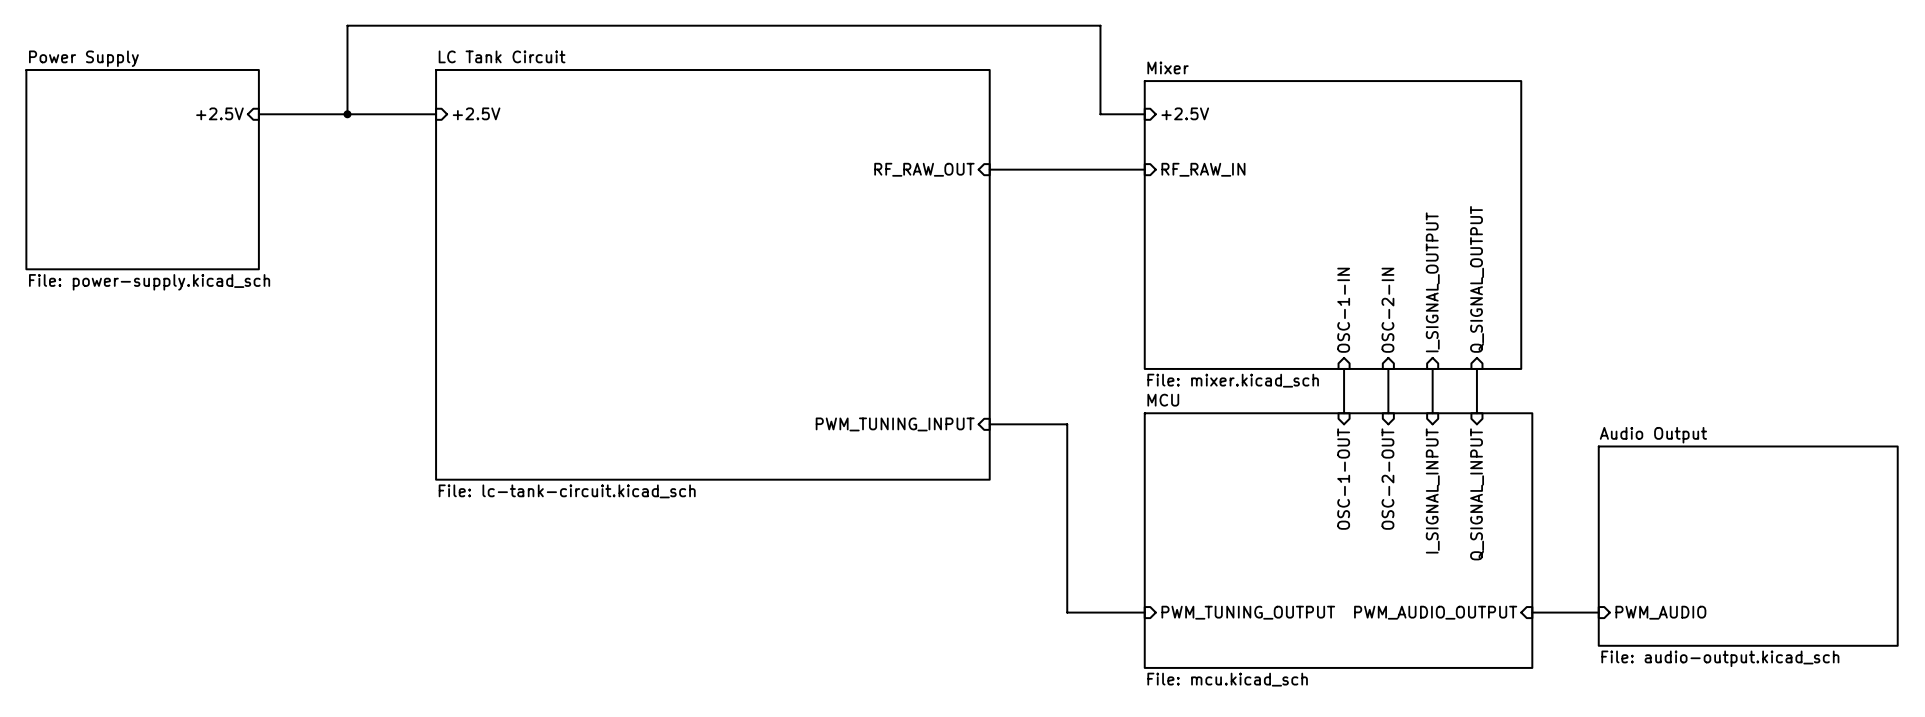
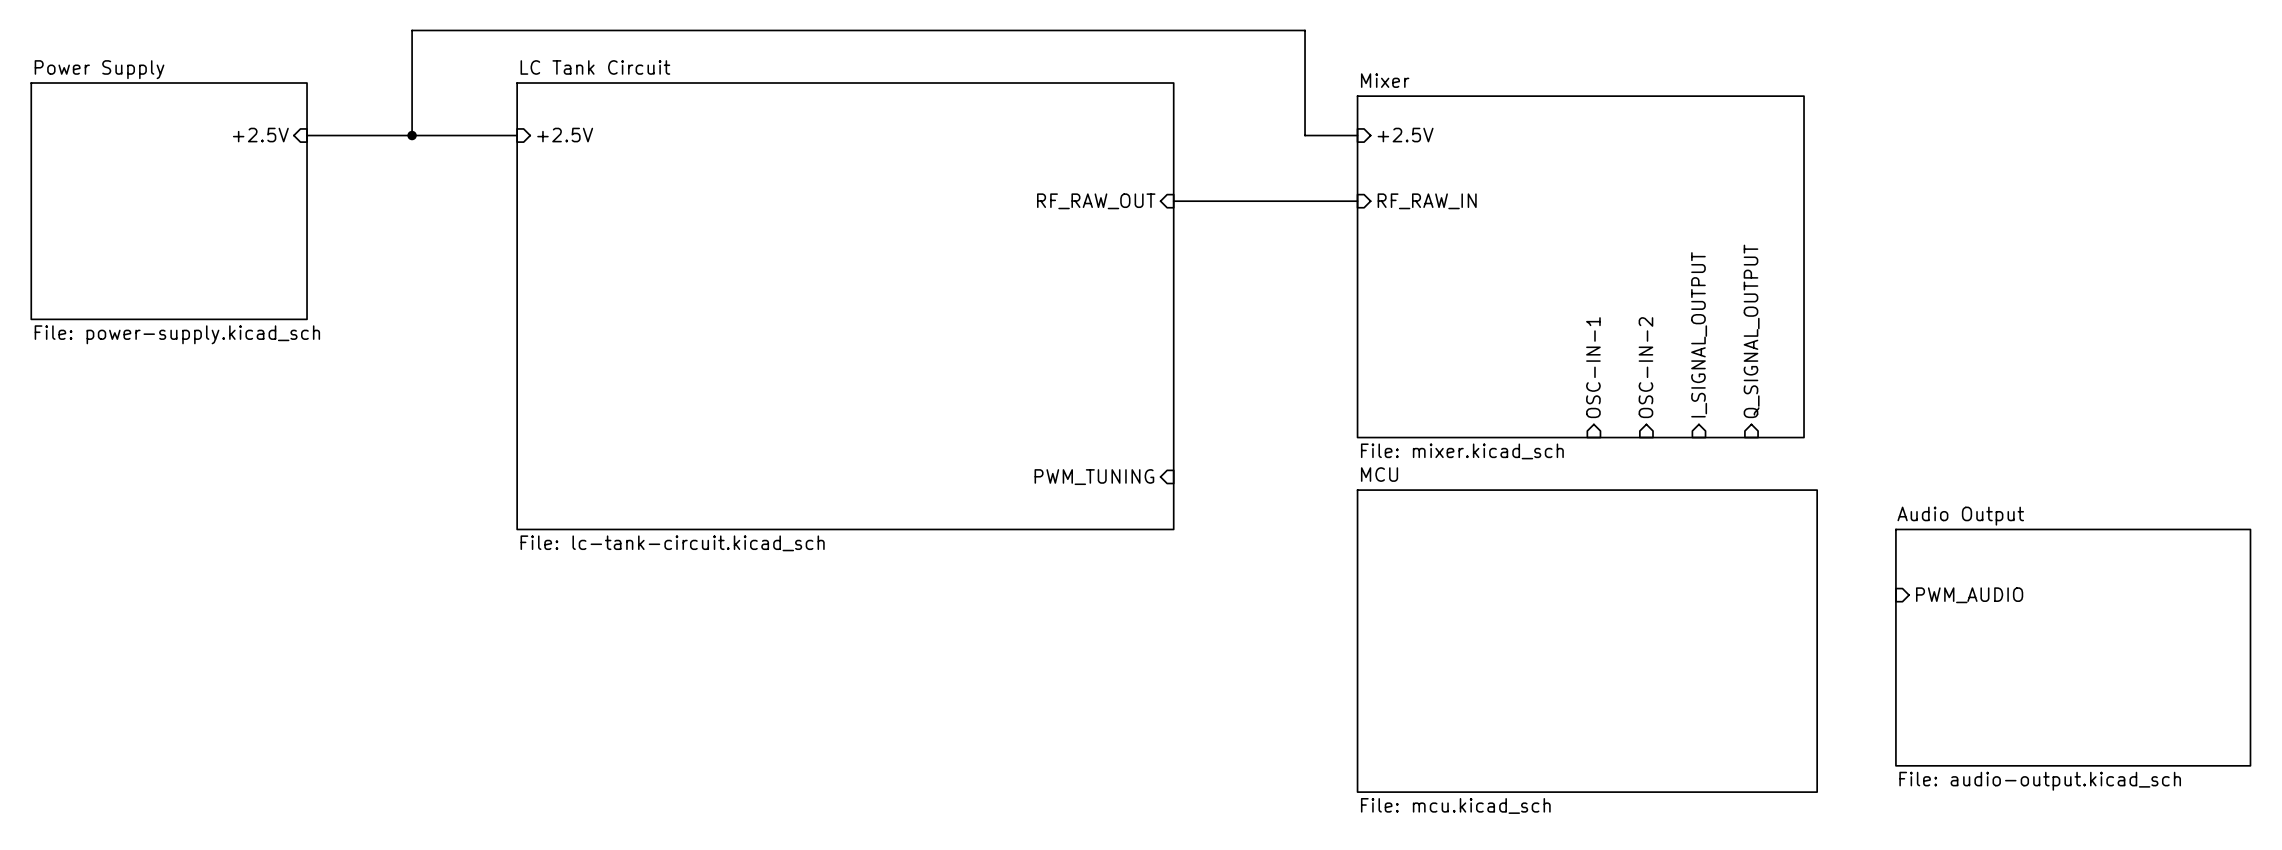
sheet LC Tank Circuit: none -> File: lc-tank-circuit.kicad_sch (845, 306)
sheet LC Tank Circuit: File: lc-tank-circuit.kicad_sch (712, 274) -> none
sheet pin: OSC-1-IN (1343, 310) -> OSC-IN-1 (1593, 367)
sheet pin: OSC-2-IN (1387, 310) -> OSC-IN-2 (1645, 367)
wire: (1344, 368) (1344, 413) -> none
wire: (1388, 368) (1388, 413) -> none
wire: (1432, 368) (1432, 413) -> none
wire: (1476, 368) (1476, 413) -> none
sheet pin: PWM_TUNING_INPUT (895, 424) -> PWM_TUNING (1094, 477)
wire: (989, 424) (1067, 424) (1067, 612) (1144, 612) -> none
sheet pin: OSC-1-OUT (1343, 479) -> none
sheet pin: OSC-2-OUT (1387, 479) -> none
sheet pin: I_SIGNAL_INPUT (1432, 490) -> none
sheet pin: Q_SIGNAL_INPUT (1477, 494) -> none
sheet pin: PWM_TUNING_OUTPUT (1248, 612) -> none
sheet pin: PWM_AUDIO_OUTPUT (1435, 612) -> none
wire: (1532, 612) (1598, 612) -> none
sheet pin position: PWM_AUDIO (1660, 612) -> PWM_AUDIO (1969, 595)

